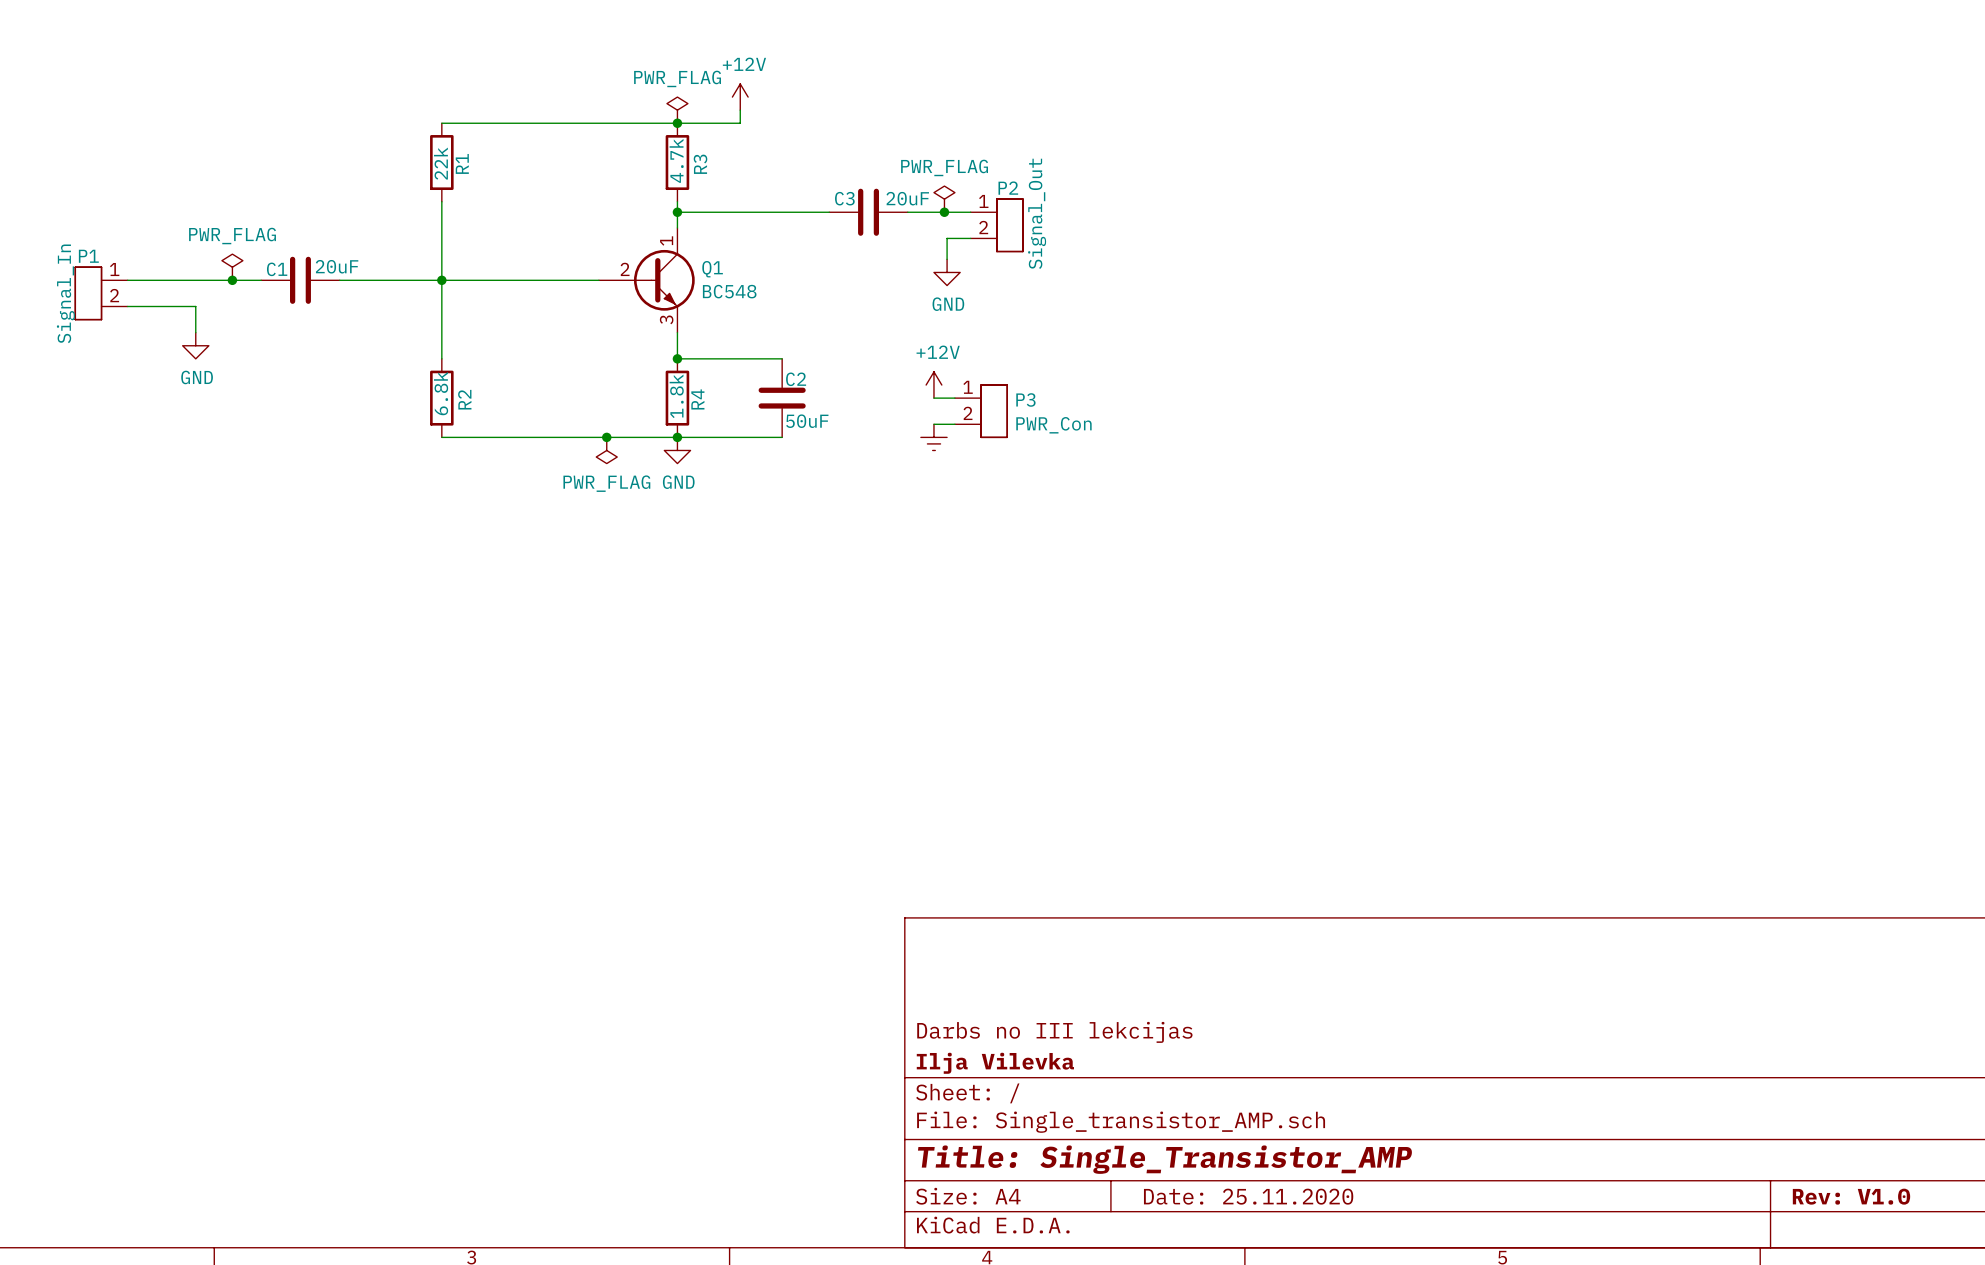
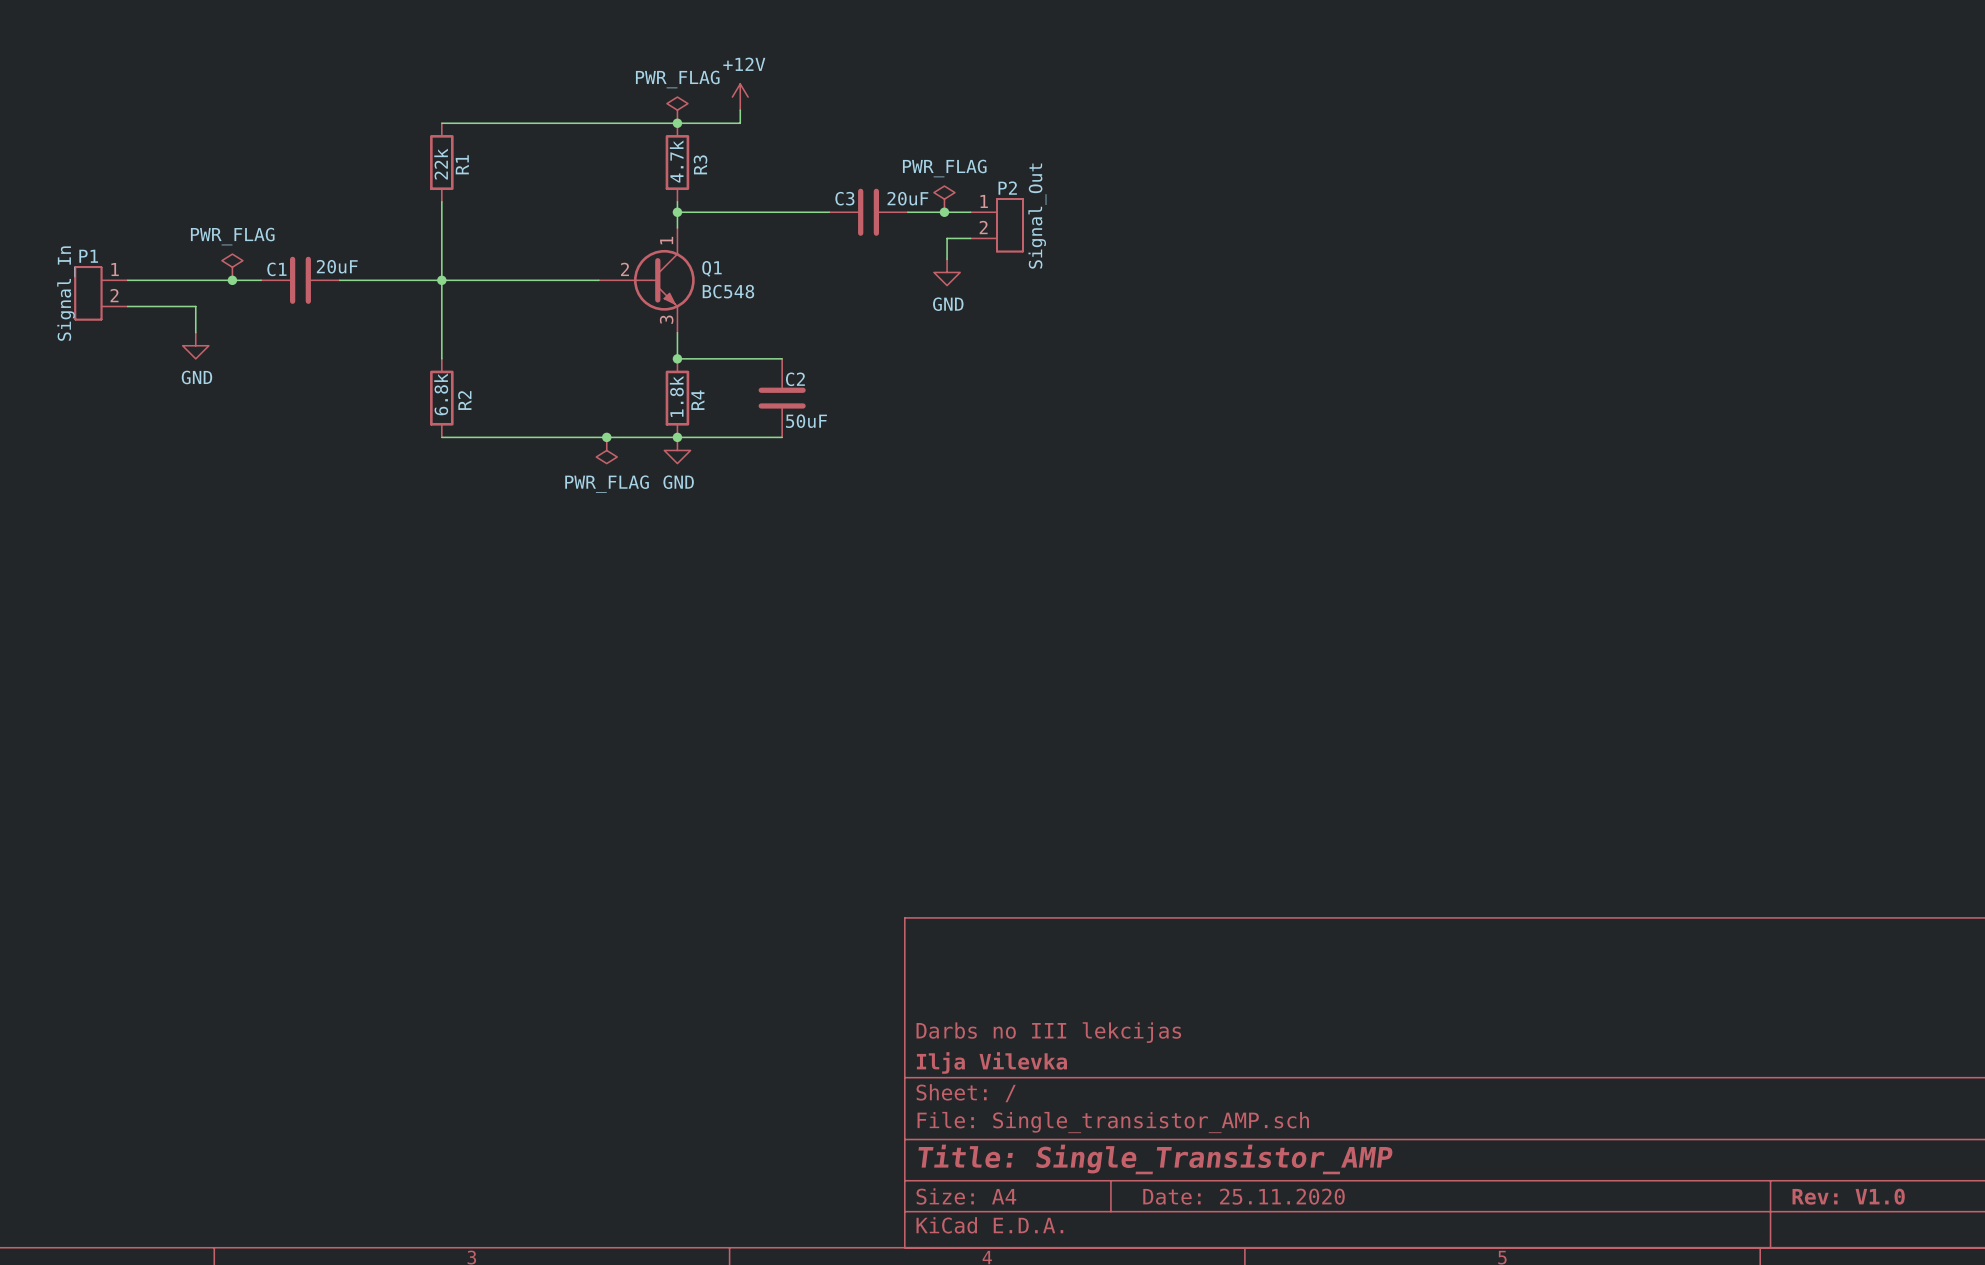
power symbol: +12V (933, 385) -> none
wire: (933, 398) (954, 398) -> none
P3: PWR_Con (981, 411) -> none
wire: (933, 424) (954, 424) -> none
power symbol: (933, 437) -> none

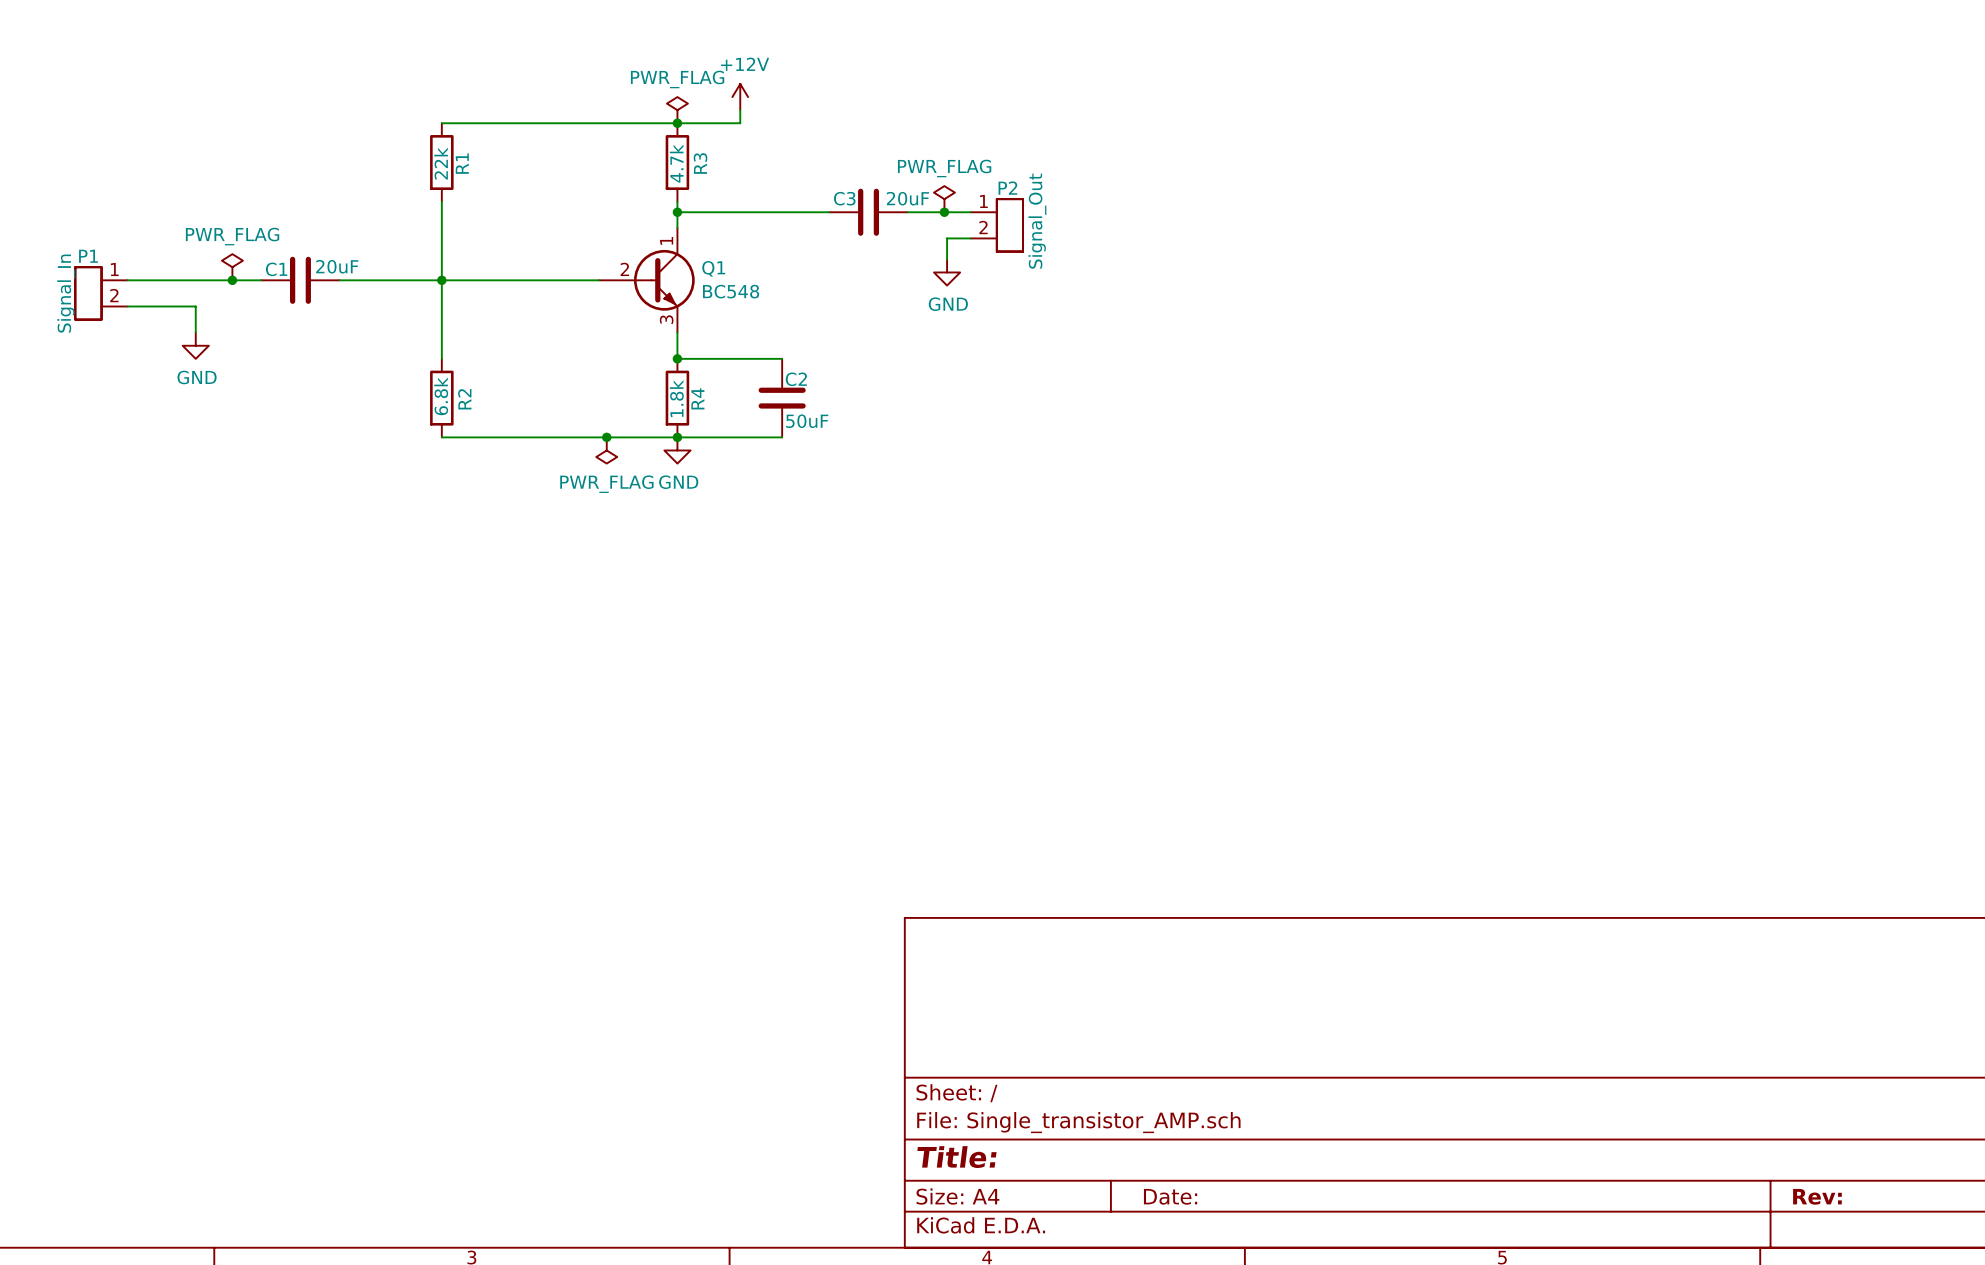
title block: Darbs no III lekcijas (1048, 1032) -> none
title block: Ilja Vilevka (991, 1062) -> none
title block: Title: Single_Transistor_AMP (1155, 1159) -> Title: (956, 1157)
title block: Date: 25.11.2020 (1244, 1196) -> Date: (1170, 1196)
title block: Rev: V1.0 (1848, 1196) -> Rev: (1817, 1196)

